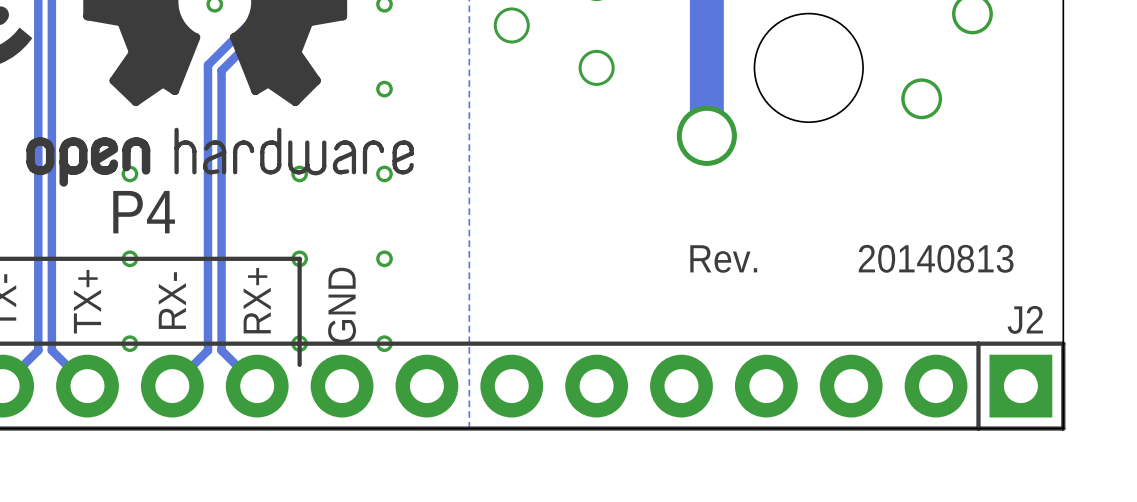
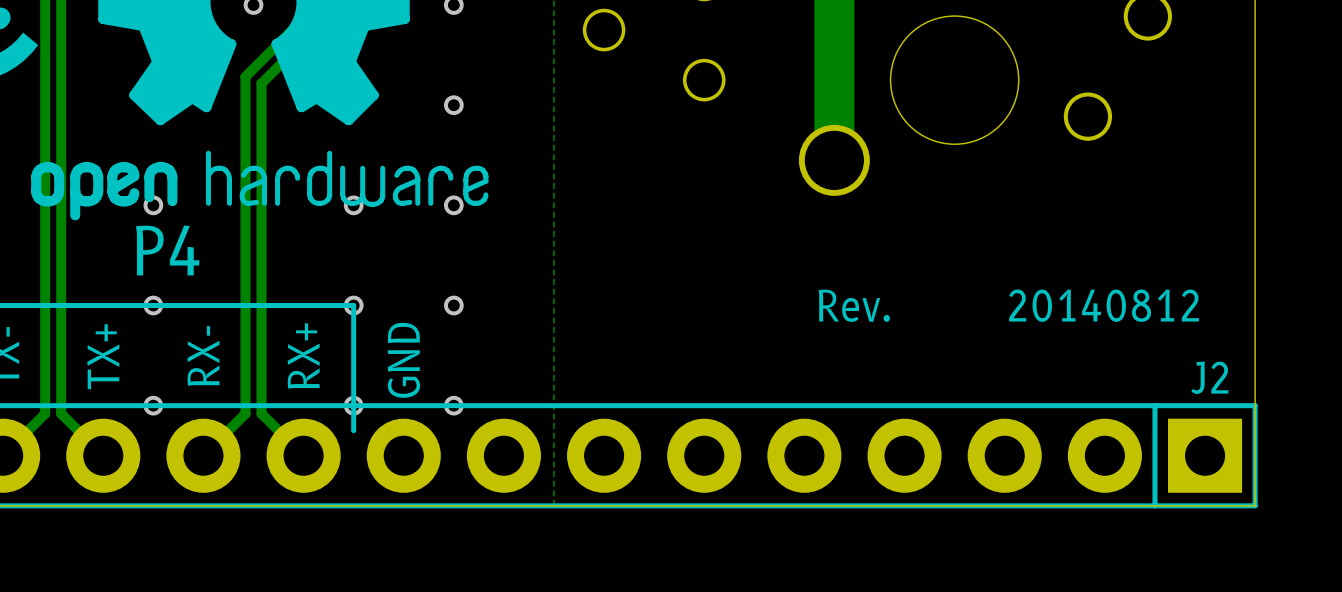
text: 20140813 (936, 258) -> 20140812 (1104, 305)

